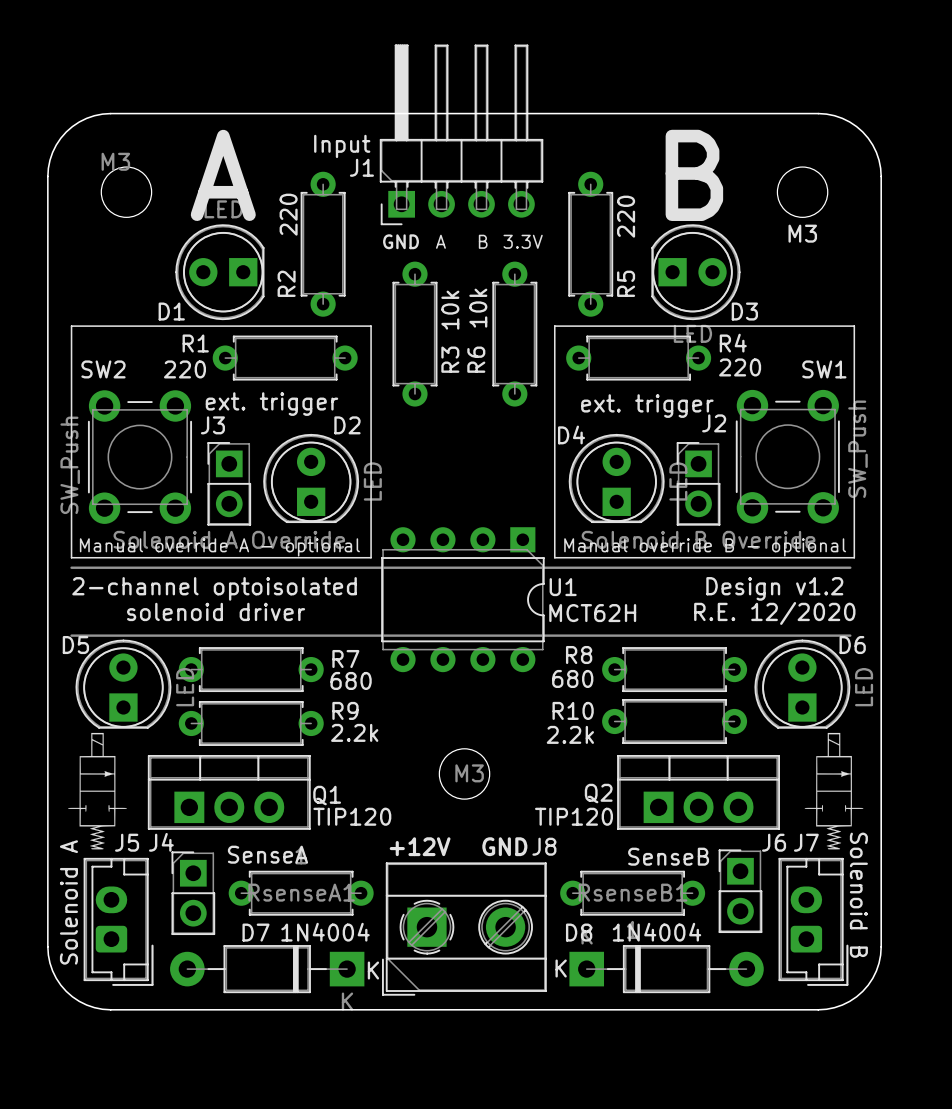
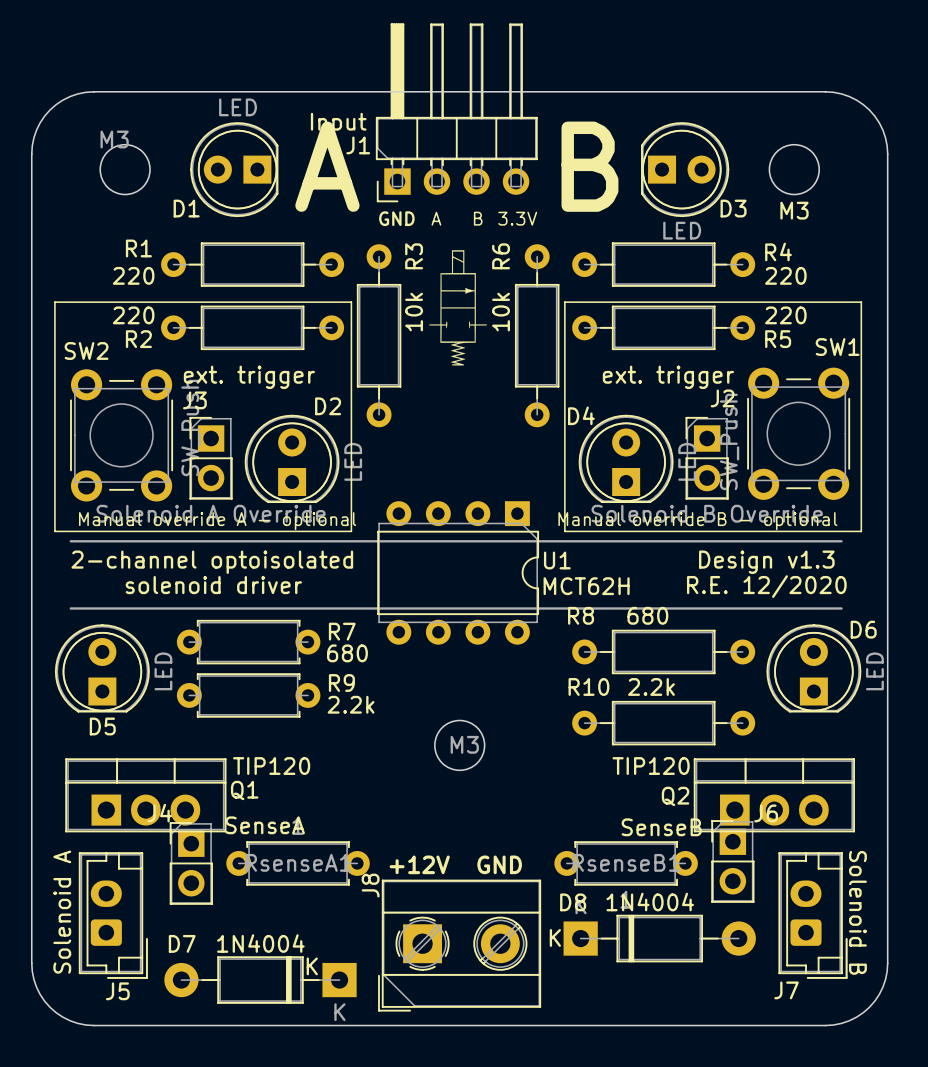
board edge: (110, 113) (86, 118) (66, 131) (52, 152) (47, 176) (48, 955) (56, 978) (72, 996) (94, 1007) (110, 1009) (818, 1009) (842, 1005) (856, 996) (868, 985) (876, 970) (881, 946) (881, 176) (876, 152) (862, 131) (842, 118) (818, 113) -> (109, 91) (77, 93) (56, 104) (44, 116) (36, 130) (31, 154) (32, 971) (40, 994) (56, 1012) (77, 1023) (94, 1025) (825, 1025) (849, 1020) (863, 1012) (874, 1001) (882, 987) (887, 963) (887, 145) (879, 122) (863, 104) (841, 93) (809, 91)
R2 footprint: [300, 171, 346, 317] -> [161, 305, 345, 351]
R5 footprint: [568, 171, 614, 317] -> [572, 305, 756, 351]
text position: A (223, 175) -> A (327, 166)
text position: B (694, 175) -> B (589, 166)
R2 value position: 220 (288, 214) -> 220 (133, 315)
R5 value position: 220 (626, 216) -> 220 (785, 315)
R3 footprint: [392, 261, 438, 407] -> [356, 244, 402, 428]
R6 footprint: [492, 261, 538, 407] -> [514, 244, 560, 428]
D1 position: (219, 272) -> (234, 169)
D3 position: (695, 272) -> (685, 169)
drawing: none -> [429, 250, 488, 366]
R2 name position: R2 (286, 283) -> R2 (138, 339)
R5 name position: R5 (626, 283) -> R5 (778, 339)
line: (71, 326) (71, 557) -> (70, 302) (54, 302) (54, 531) (70, 531)
line: (355, 326) (371, 326) (371, 557) (355, 557) -> (351, 302) (351, 531)
line: (570, 326) (554, 326) (554, 557) (570, 557) -> (564, 302) (564, 531)
line: (854, 326) (854, 557) -> (845, 302) (861, 302) (861, 531) (845, 531)
R1 footprint: [212, 335, 358, 381] -> [161, 242, 345, 287]
R4 footprint: [566, 335, 712, 381] -> [572, 242, 756, 287]
R3 name position: R3 (450, 359) -> R3 (414, 256)
R6 name position: R6 (476, 359) -> R6 (501, 256)
text position: ext. trigger (271, 404) -> ext. trigger (249, 377)
text position: ext. trigger (647, 406) -> ext. trigger (668, 377)
SW1 rotation: 0° (787, 456) -> 180° (798, 433)
SW2 rotation: 0° (139, 457) -> 180° (121, 435)
D2 position: (311, 478) -> (292, 458)
D4 position: (616, 478) -> (626, 458)
J3 position: (229, 483) -> (211, 458)
J2 position: (698, 483) -> (707, 458)
text: Design v1.2 (774, 588) -> Design v1.3 (766, 562)
D5 name position: D5 (75, 645) -> D5 (102, 726)
R8 footprint: [602, 647, 748, 693] -> [572, 629, 756, 675]
R8 value position: 680 (572, 678) -> 680 (647, 615)
D5 position: (123, 684) -> (102, 668)
D6 position: (802, 684) -> (813, 668)
R10 footprint: [602, 699, 748, 744] -> [572, 700, 756, 746]
R10 name position: R10 (573, 710) -> R10 (588, 686)
drawing: [68, 732, 127, 850] -> none
drawing: [804, 732, 864, 850] -> none
R10 value position: 2.2k (570, 734) -> 2.2k (651, 686)
Q1 position: (229, 792) -> (145, 795)
Q2 position: (698, 792) -> (774, 795)
Q1 name position: Q1 (327, 795) -> Q1 (244, 790)
Q1 value position: TIP120 (352, 816) -> TIP120 (271, 766)
Q2 value position: TIP120 (573, 816) -> TIP120 (651, 766)
J5 name position: J5 (127, 842) -> J5 (117, 991)
J7 name position: J7 (806, 842) -> J7 (786, 990)
text position: +12V (420, 846) -> +12V (419, 864)
text position: GND (504, 846) -> GND (499, 864)
J8 name rotation: 0° (544, 846) -> 90° counterclockwise (370, 885)
J8 name position: J8 (544, 846) -> J8 (370, 885)
J7 value position: Solenoid B (858, 895) -> Solenoid B (857, 912)
J5 value position: Solenoid A (68, 902) -> Solenoid A (62, 912)
J5 position: (118, 921) -> (113, 915)
J7 position: (813, 921) -> (812, 915)
J8 position: (464, 929) -> (459, 945)
D7 name position: D7 (255, 932) -> D7 (182, 943)
D7 value position: 1N4004 (325, 932) -> 1N4004 (260, 943)
D7 position: (267, 969) -> (260, 980)
D7 text position: K (373, 970) -> K (312, 966)

